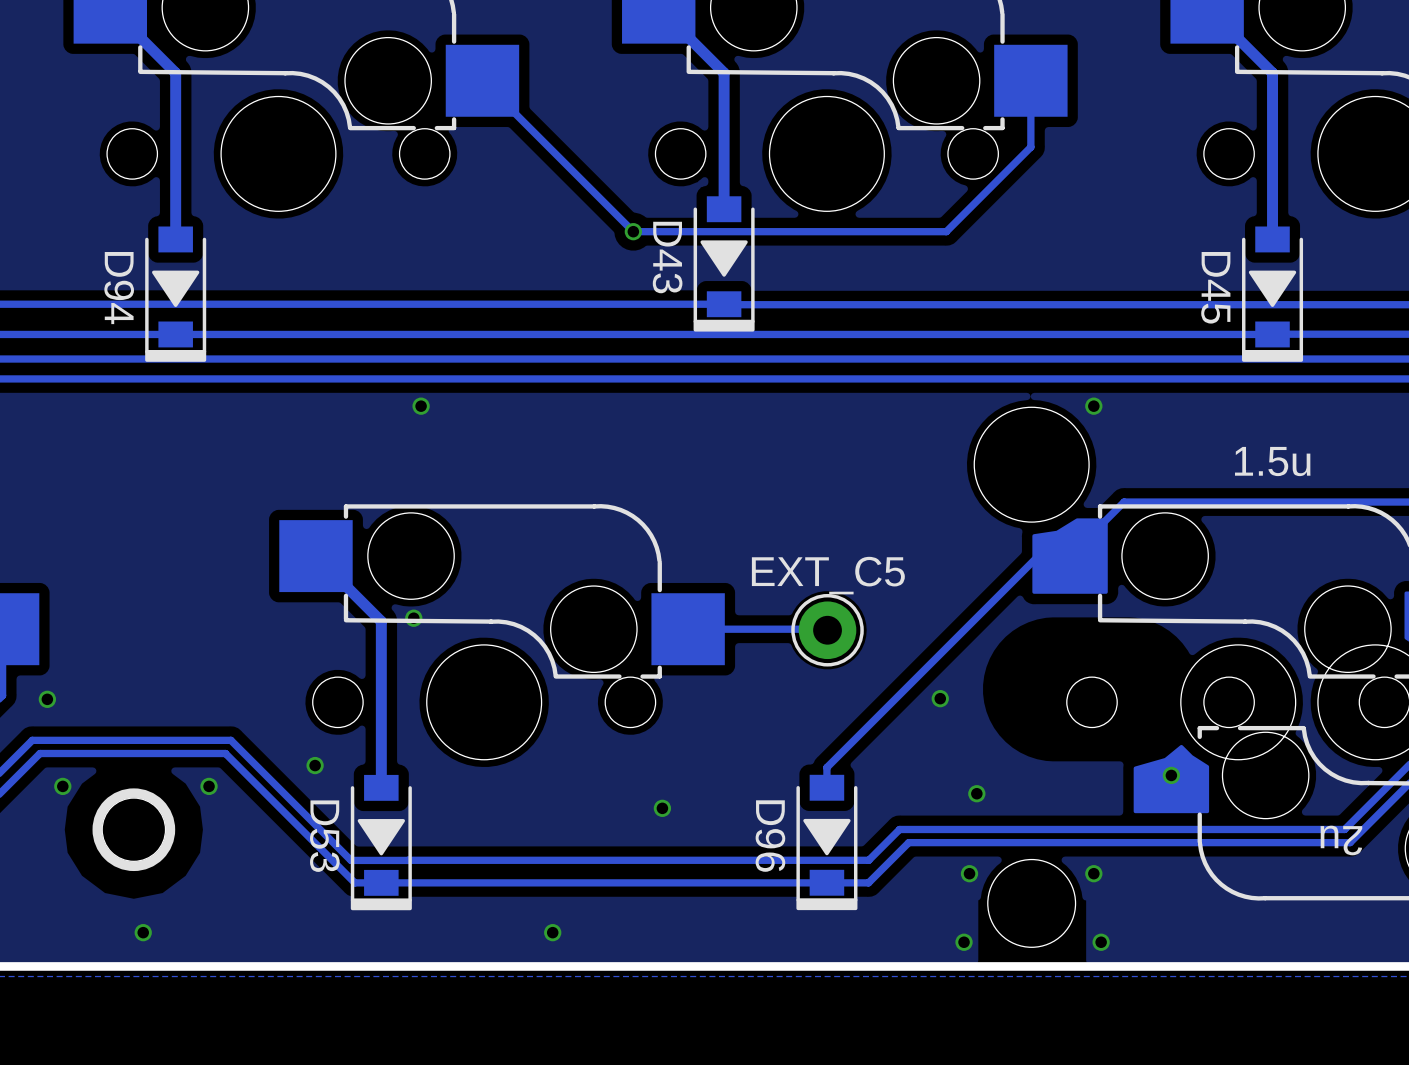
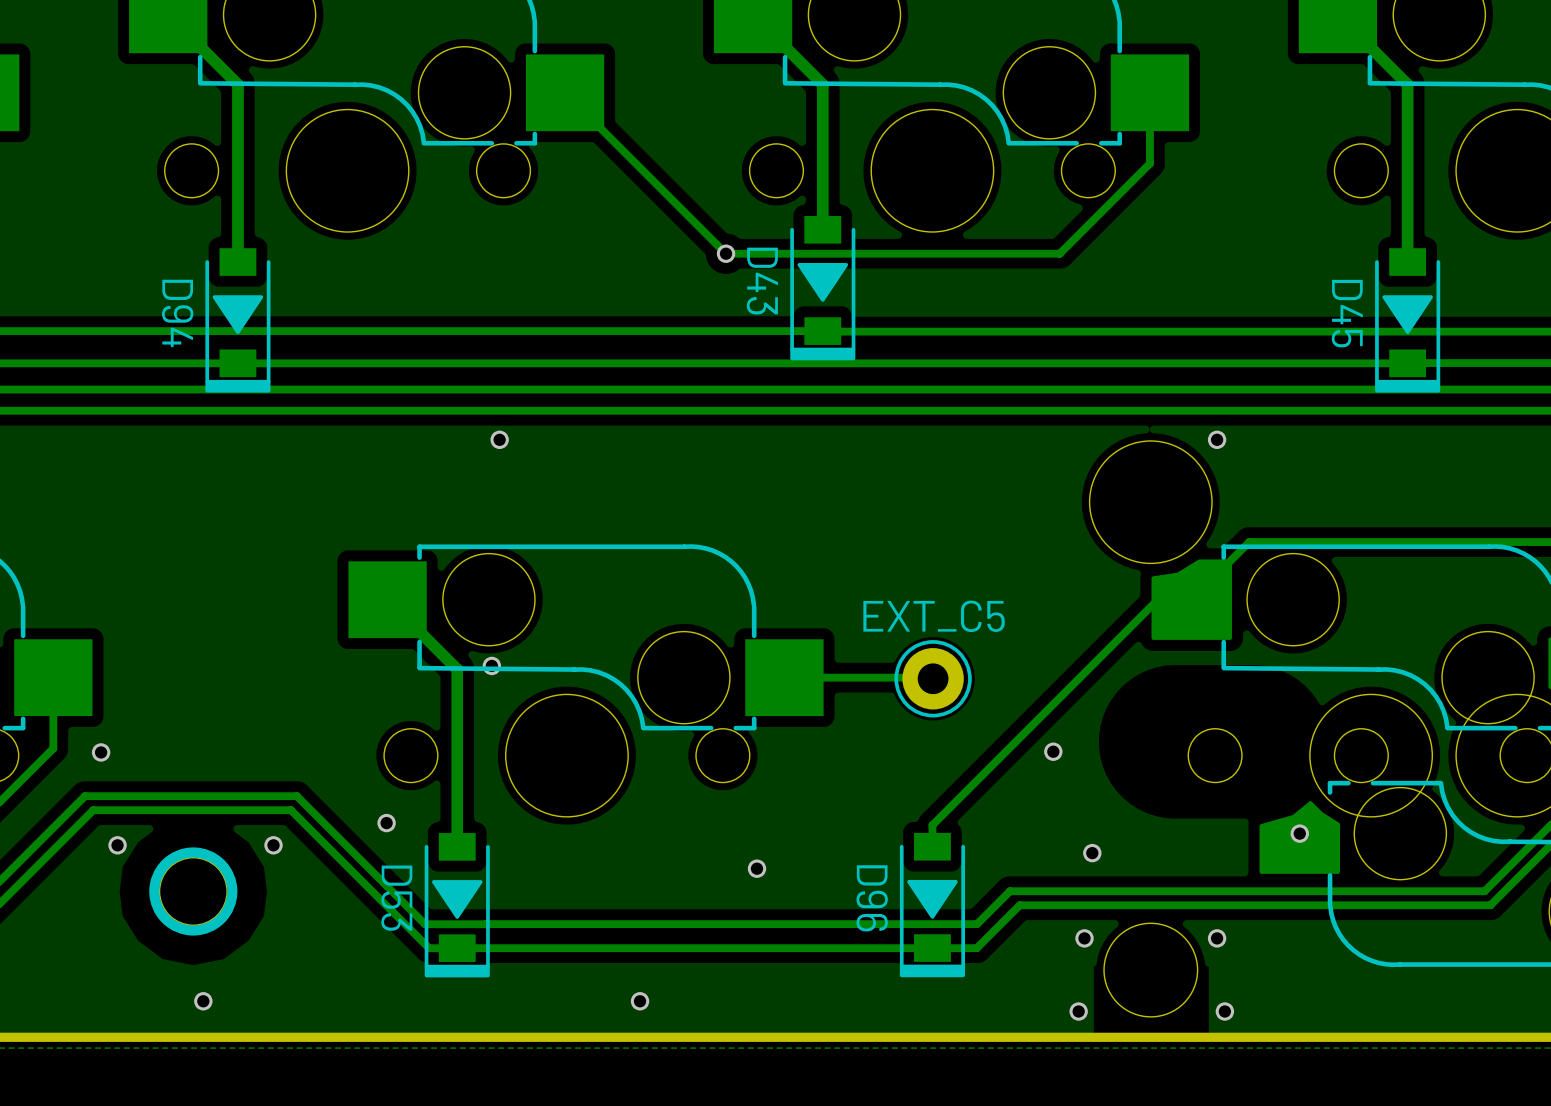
text: 1.5u (1272, 461) -> none
text: 2u (1341, 840) -> none

